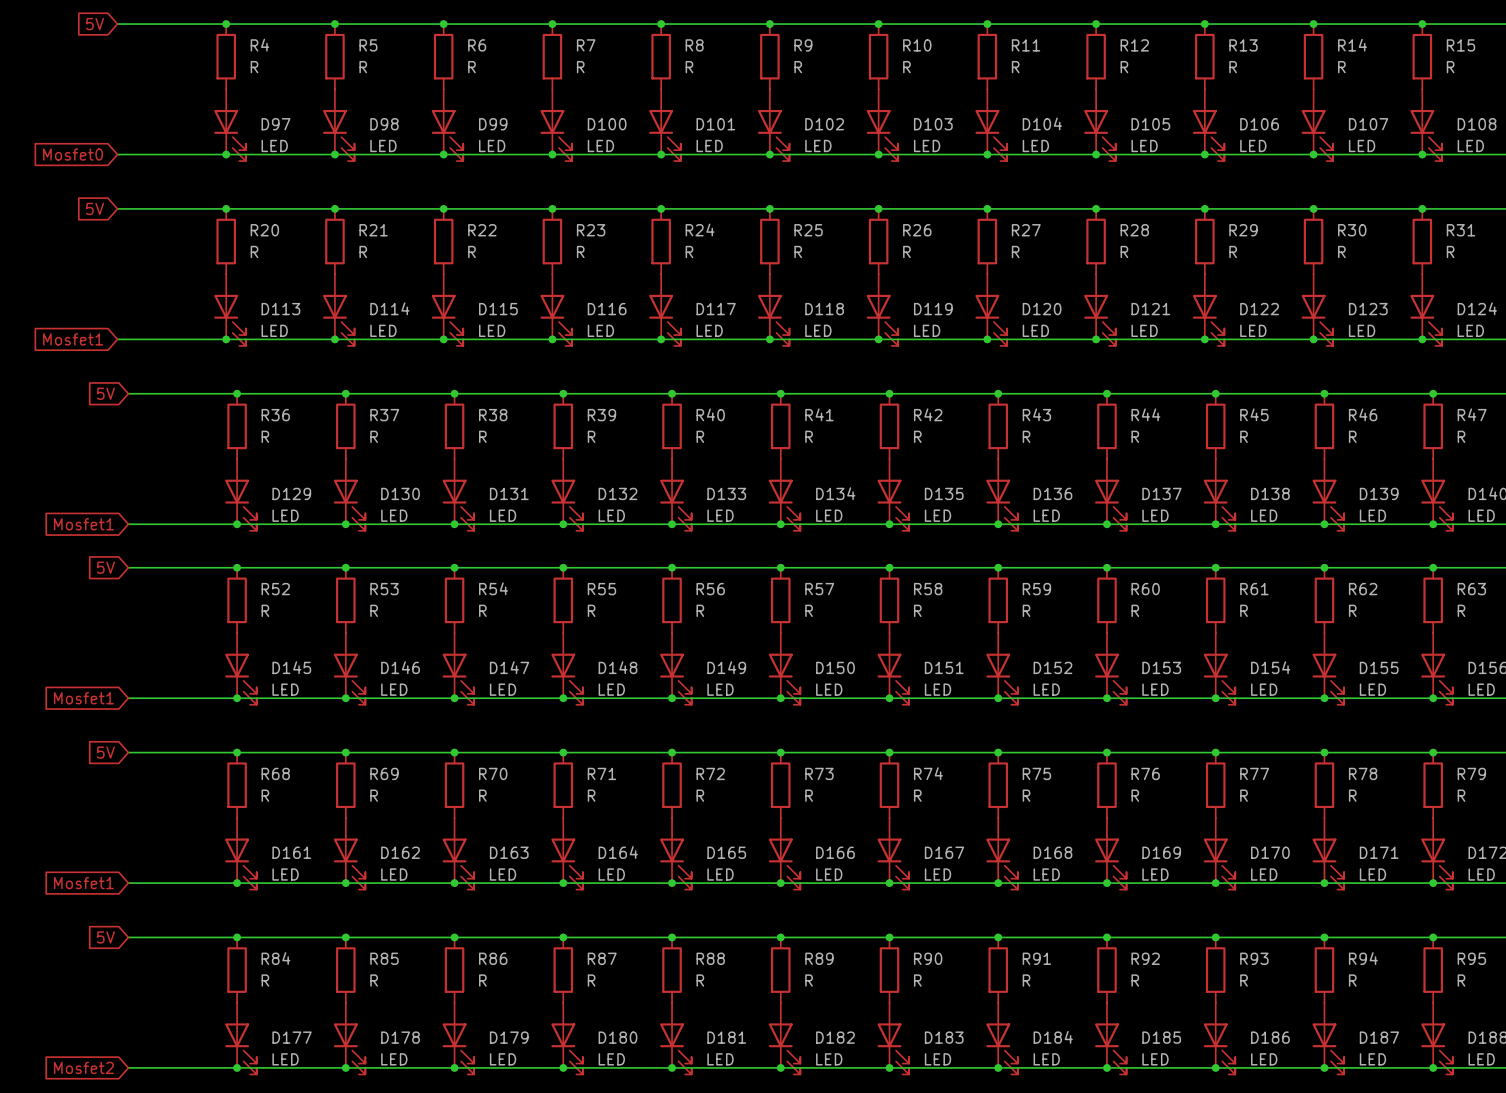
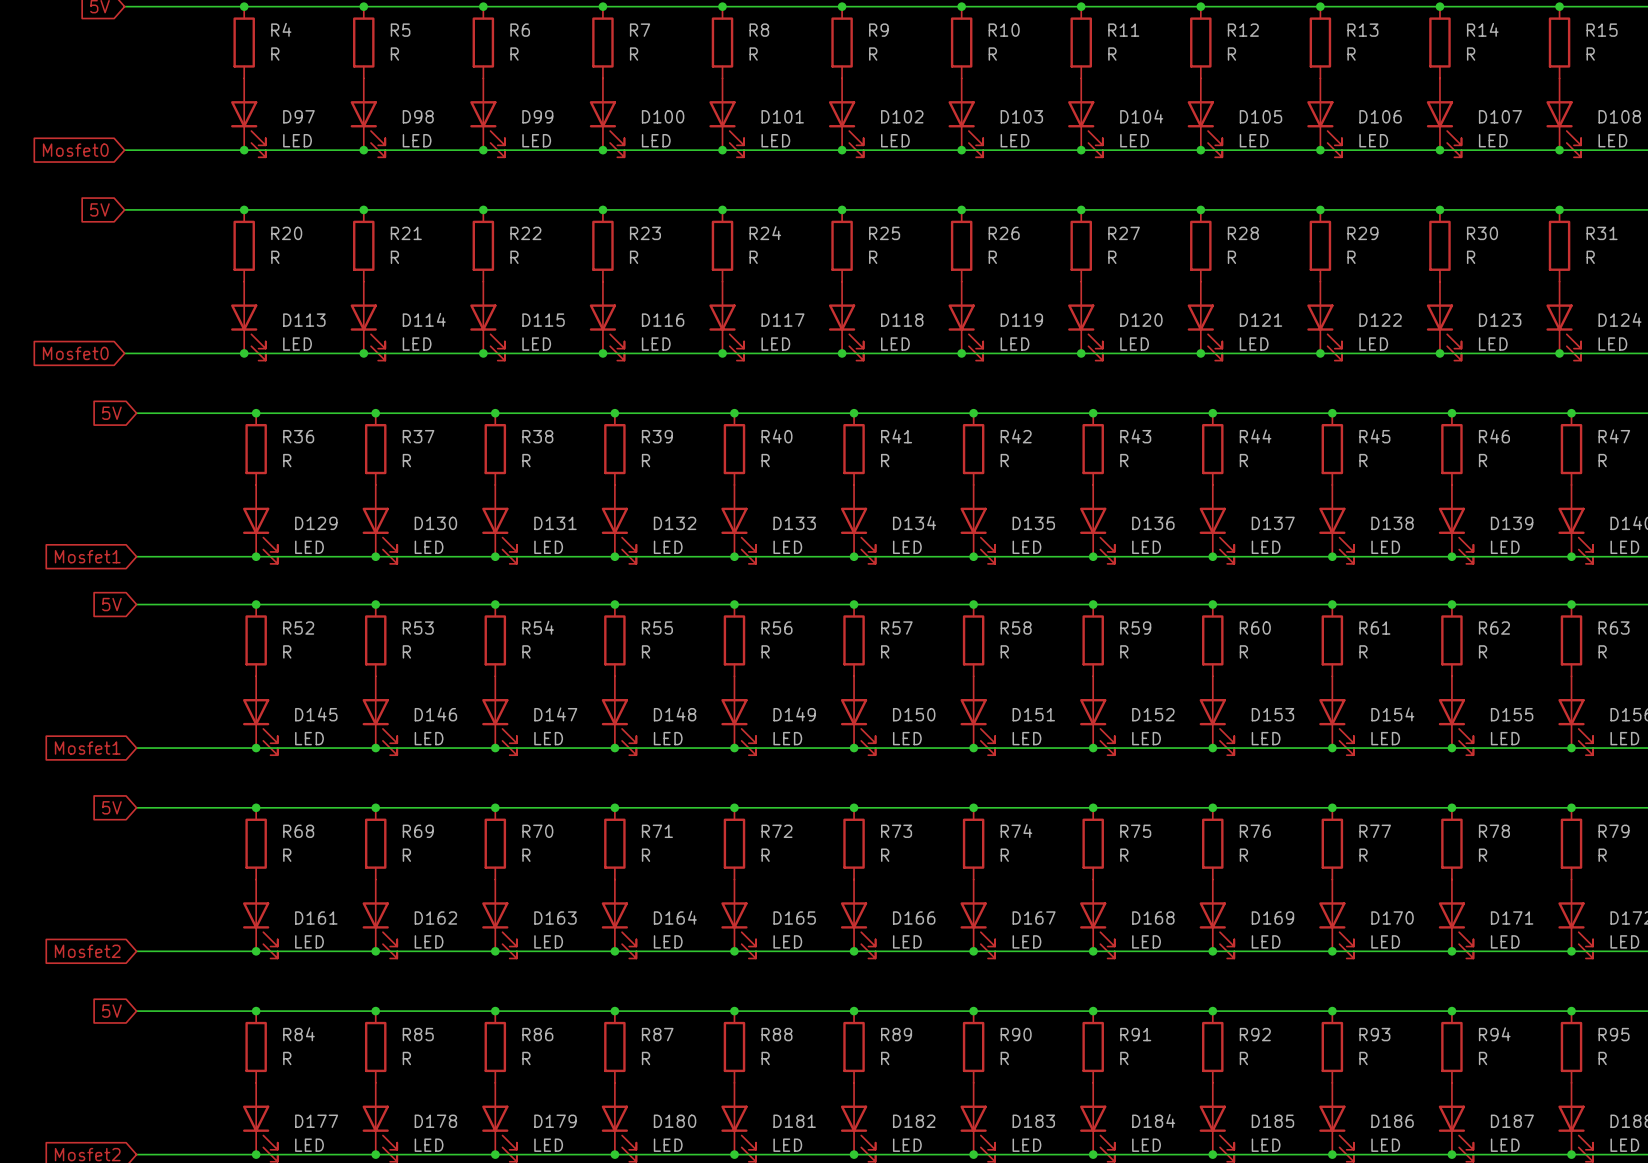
global label: Mosfet1 (73, 339) -> Mosfet0 (75, 353)
global label: Mosfet1 (83, 883) -> Mosfet2 (87, 951)

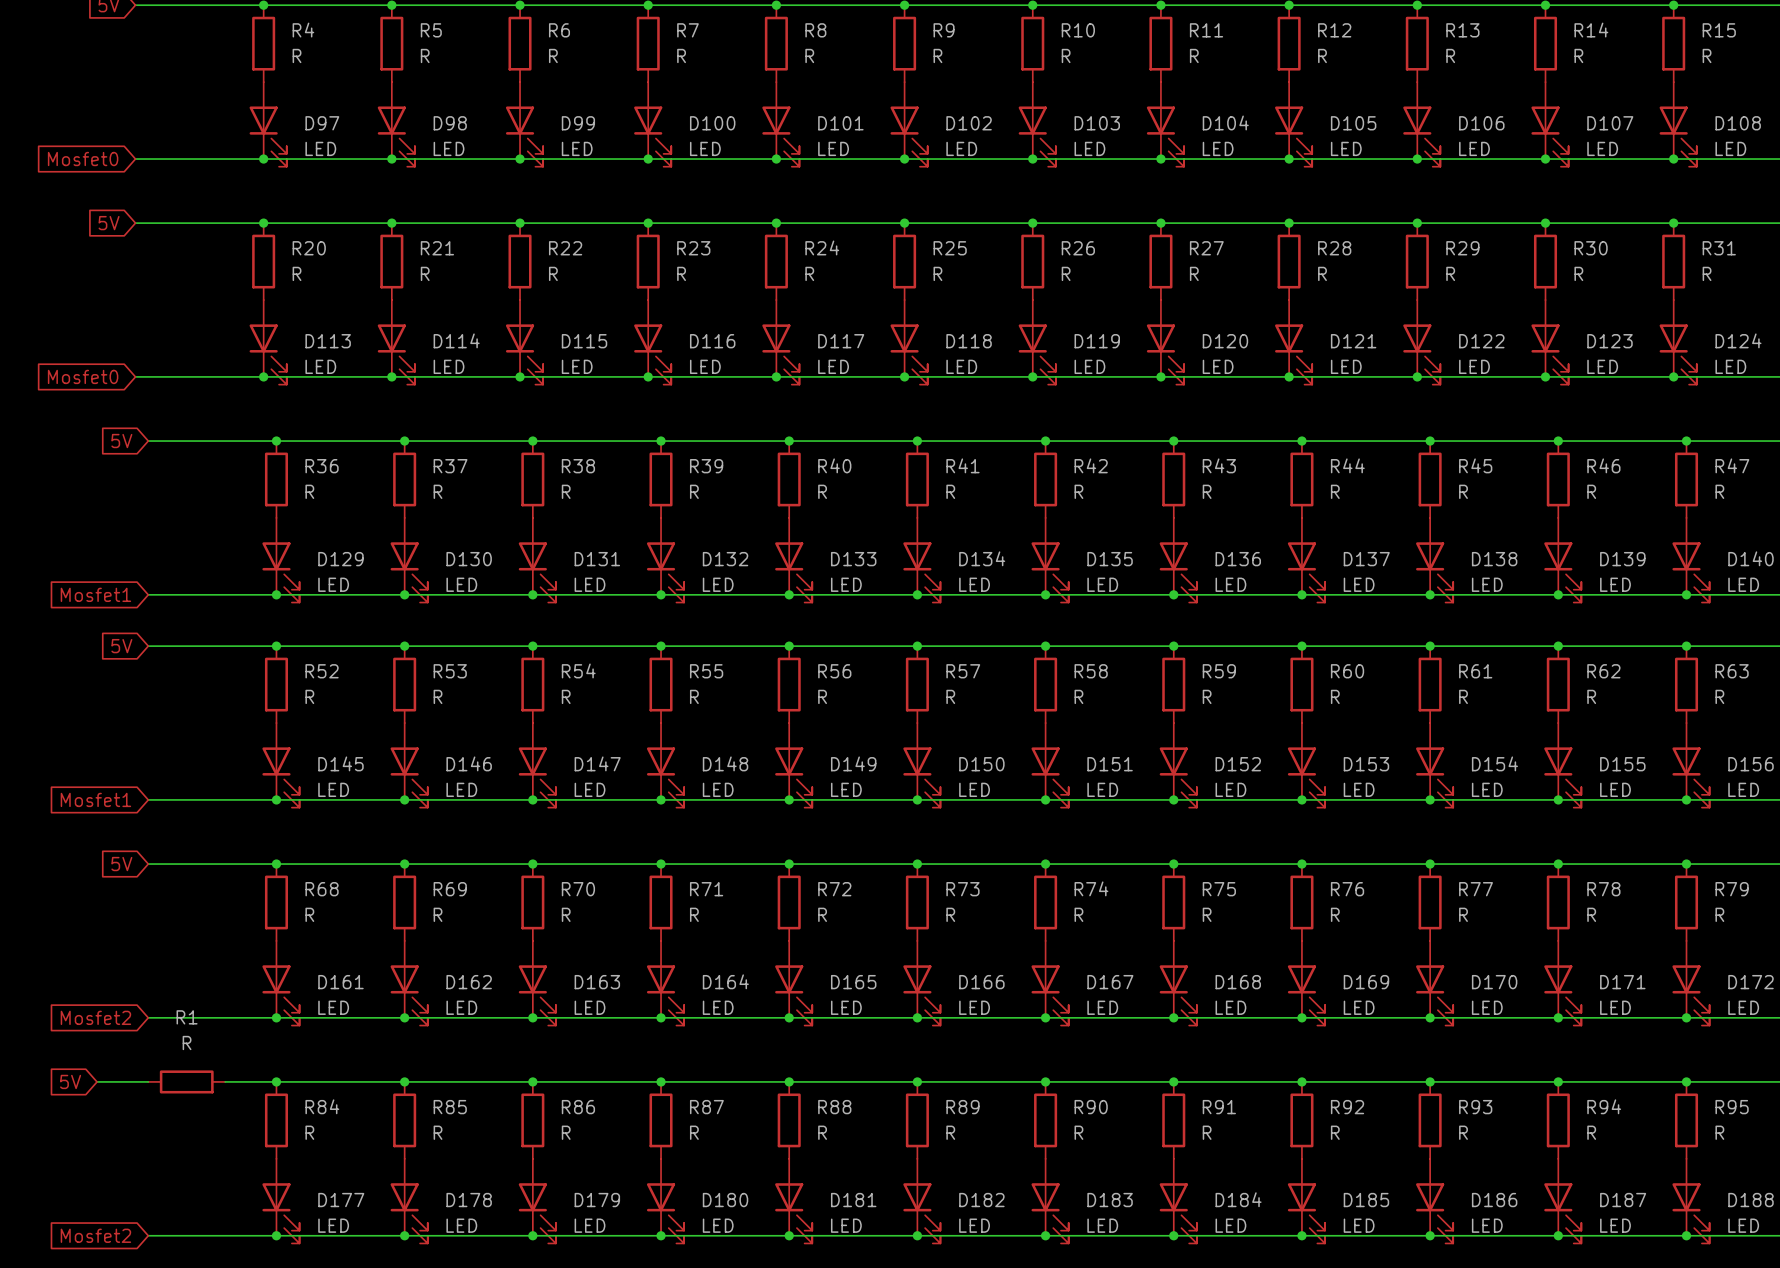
global label position: 5V (111, 1011) -> 5V (70, 1081)
wire: (136, 1011) (208, 1011) -> (148, 1081) (97, 1081)
R1: none -> R (186, 1081)

